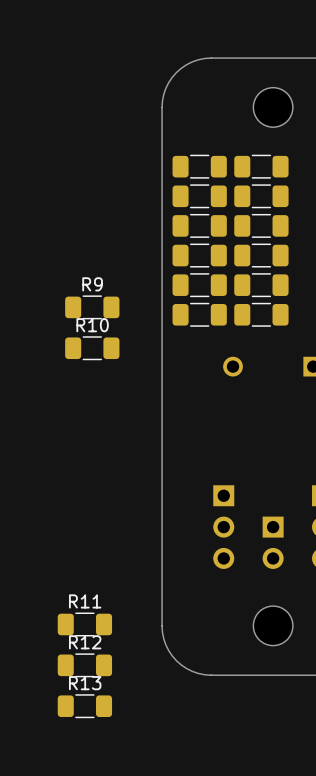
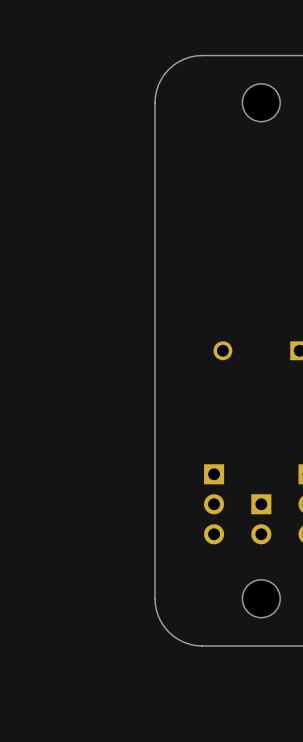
part: (199, 166) -> none
part: (261, 166) -> none
part: (199, 196) -> none
part: (261, 196) -> none
part: (199, 225) -> none
part: (261, 225) -> none
part: (199, 255) -> none
part: (261, 255) -> none
part: (199, 285) -> none
part: (261, 285) -> none
R9: (92, 307) -> none
part: (199, 314) -> none
part: (261, 314) -> none
R10: (92, 348) -> none
R11: (84, 624) -> none
R12: (84, 665) -> none
R13: (84, 706) -> none

